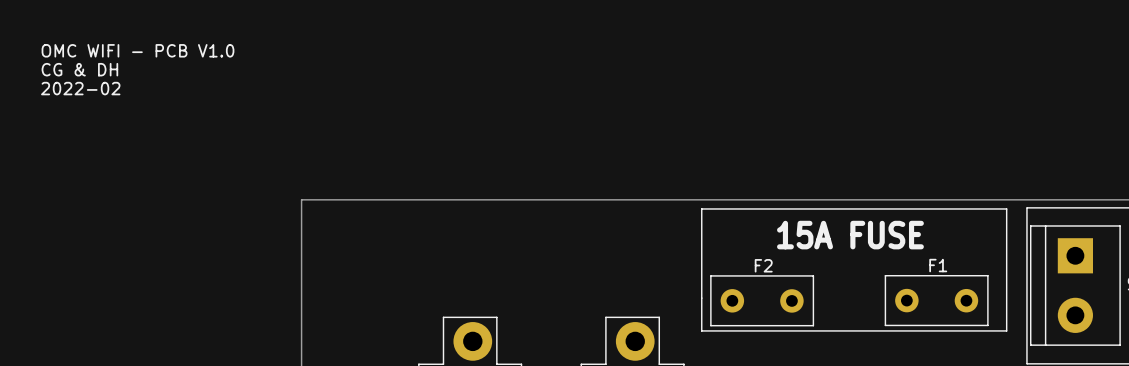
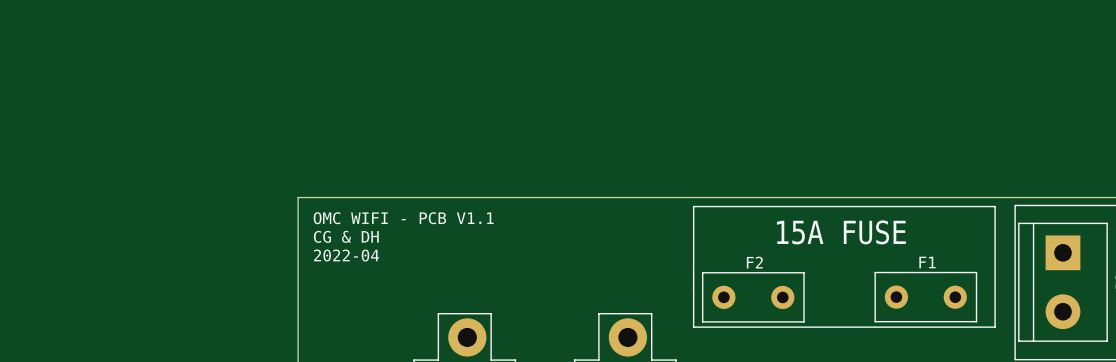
text: OMC WIFI - PCB V1.0 (137, 50) -> none
text: CG & DH (79, 69) -> none
text: 2022-02 (80, 88) -> none
text: none -> OMC WIFI - PCB V1.1 (403, 218)
text: none -> CG & DH (346, 236)
text: none -> 2022-04 (346, 255)

